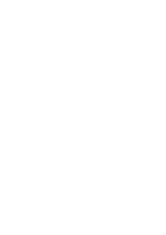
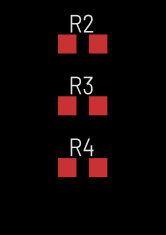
R2: none -> (82, 44)
R3: none -> (82, 105)
R4: none -> (82, 167)

